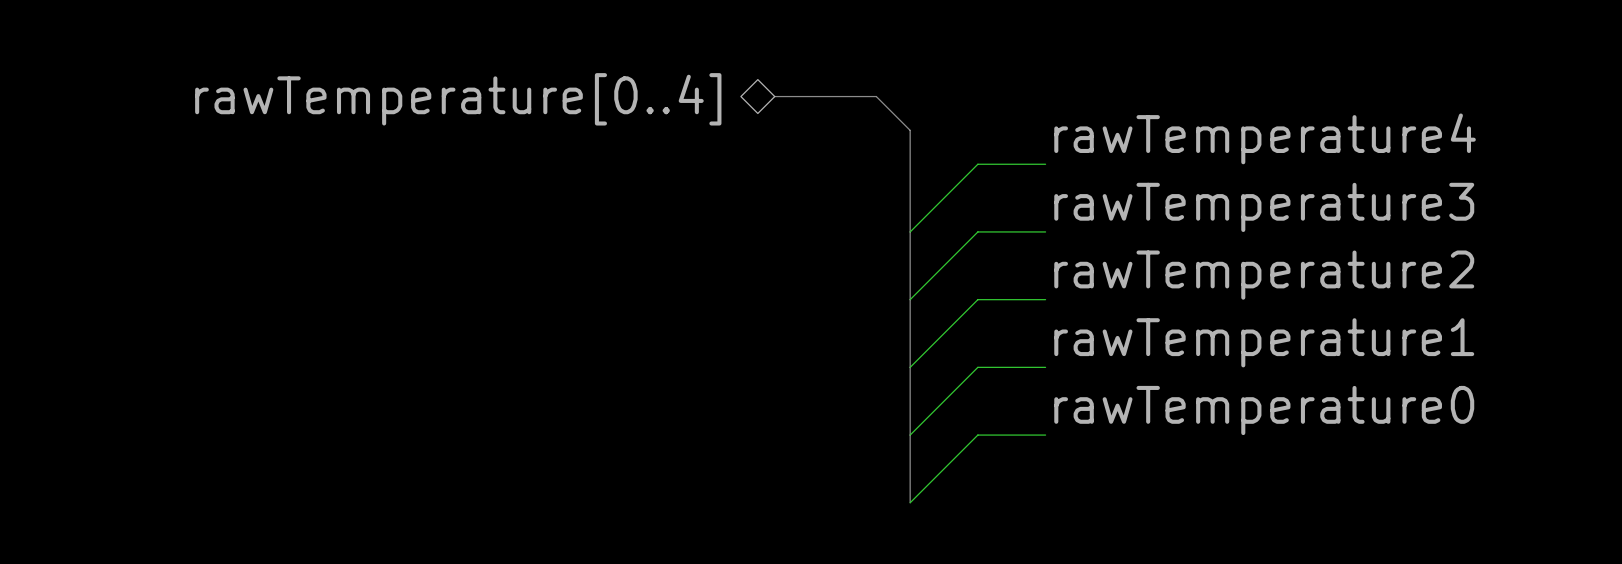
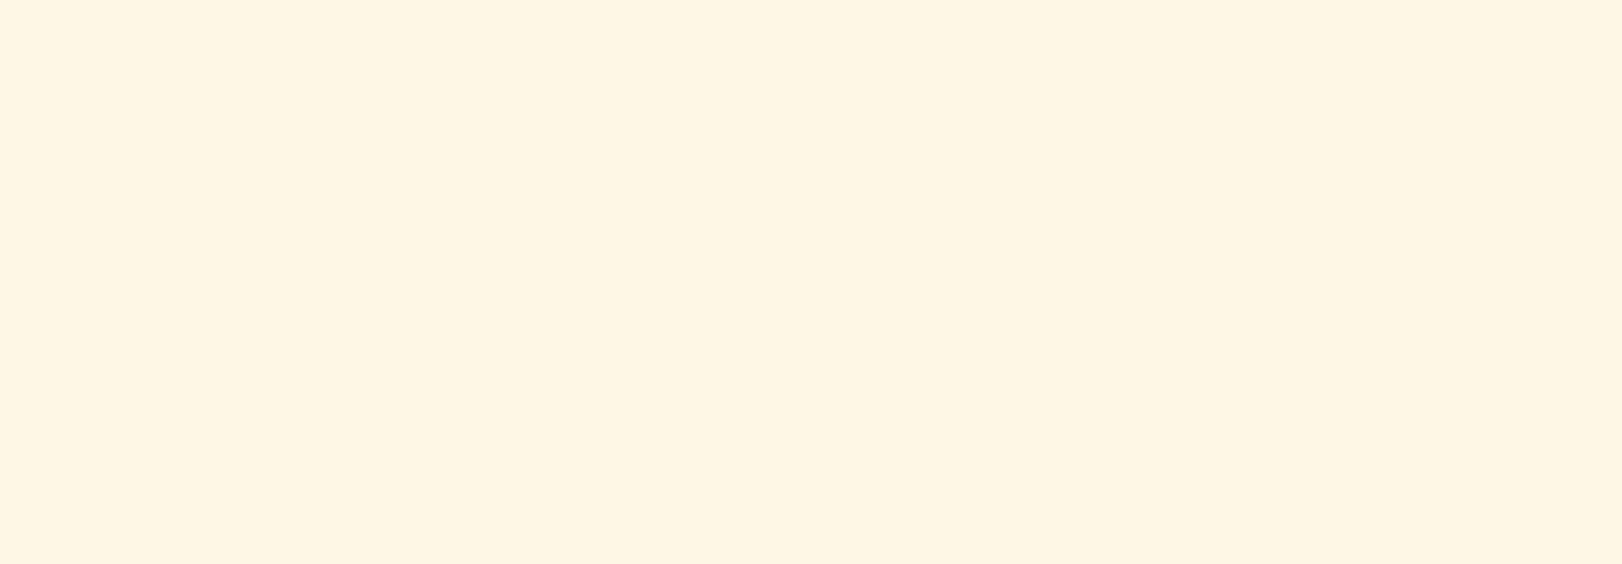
bus: (774, 96) (876, 96) (910, 130) (910, 502) -> none
hierarchical label: rawTemperature[0..4] (458, 99) -> none
label: rawTemperature4 (1265, 138) -> none
wire: (1045, 164) (977, 164) (910, 231) -> none
label: rawTemperature3 (1264, 207) -> none
wire: (1045, 231) (977, 231) (910, 299) -> none
label: rawTemperature2 (1264, 275) -> none
wire: (1045, 299) (977, 299) (910, 367) -> none
label: rawTemperature1 (1264, 342) -> none
wire: (1045, 367) (977, 367) (910, 435) -> none
label: rawTemperature0 (1264, 410) -> none
wire: (1045, 435) (977, 435) (910, 502) -> none

